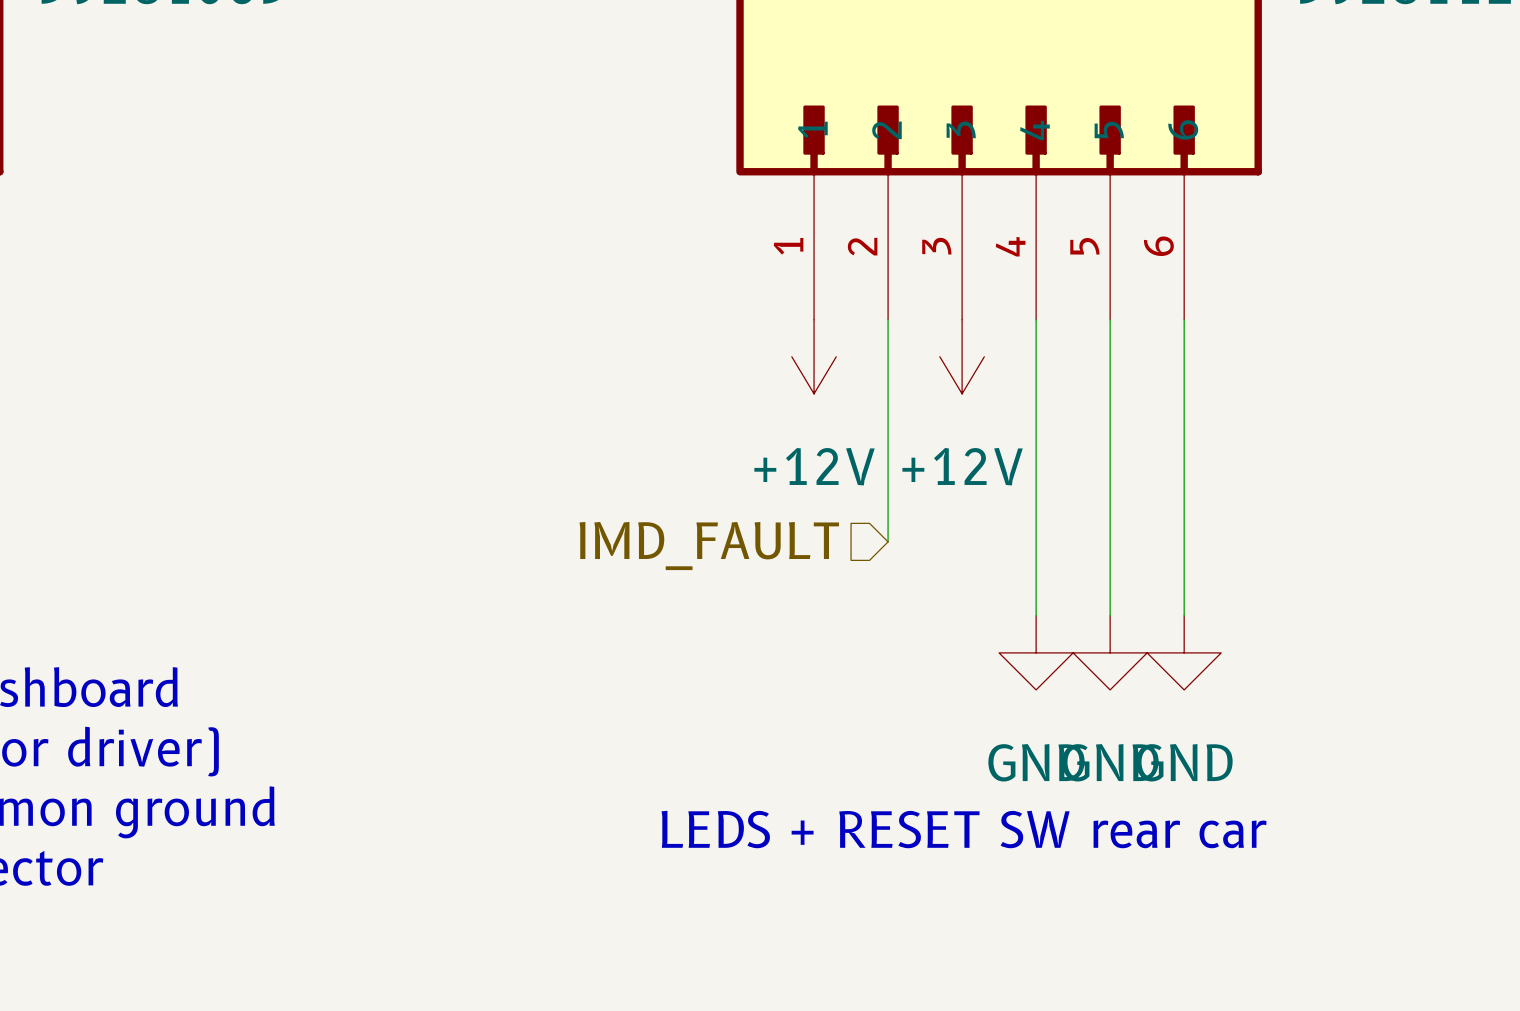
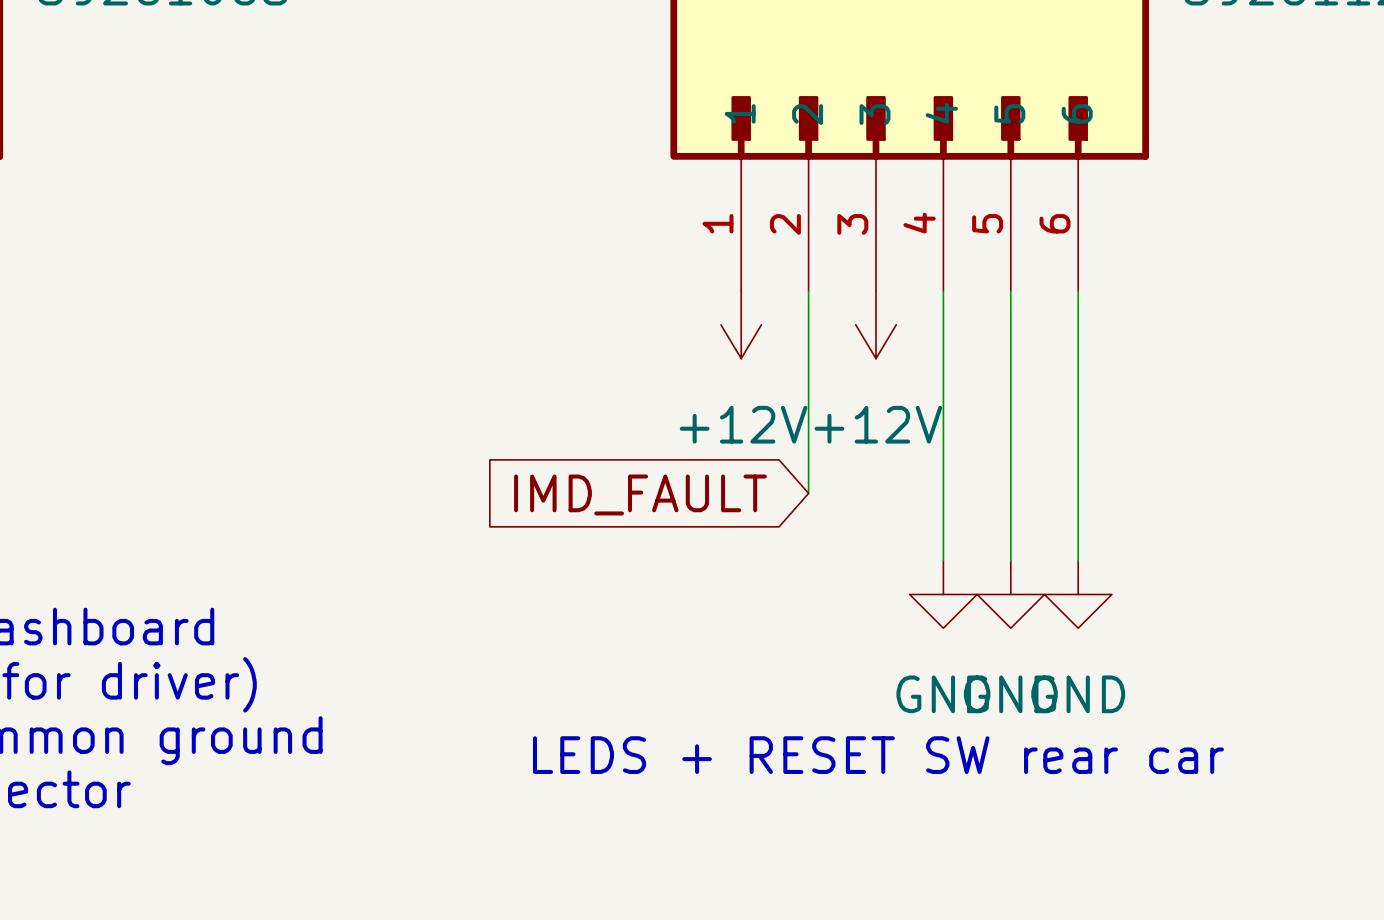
hierarchical label: IMD_FAULT (709, 546) -> none
global label: none -> IMD_FAULT (640, 494)

